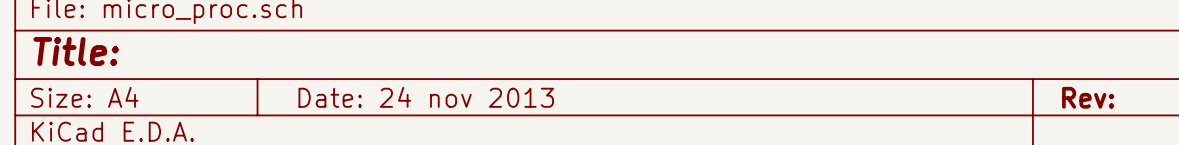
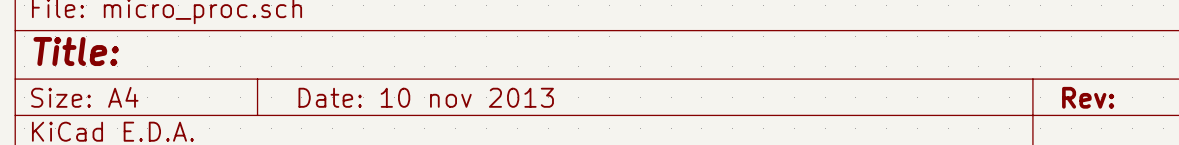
title block: Date: 24 nov 2013 (426, 97) -> Date: 10 nov 2013 (426, 97)

